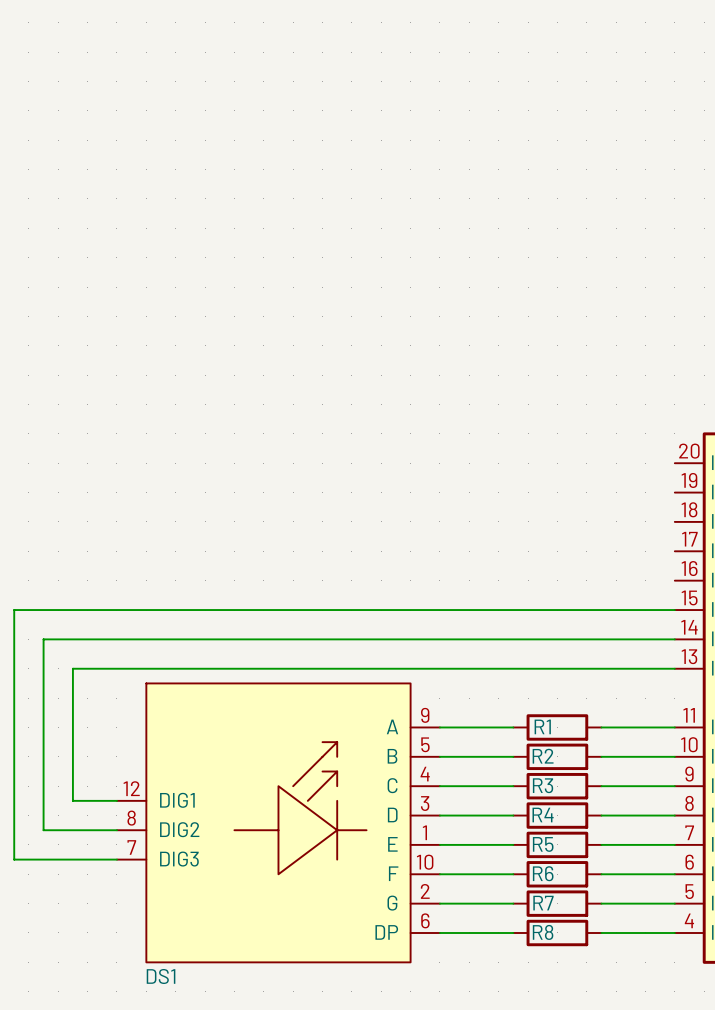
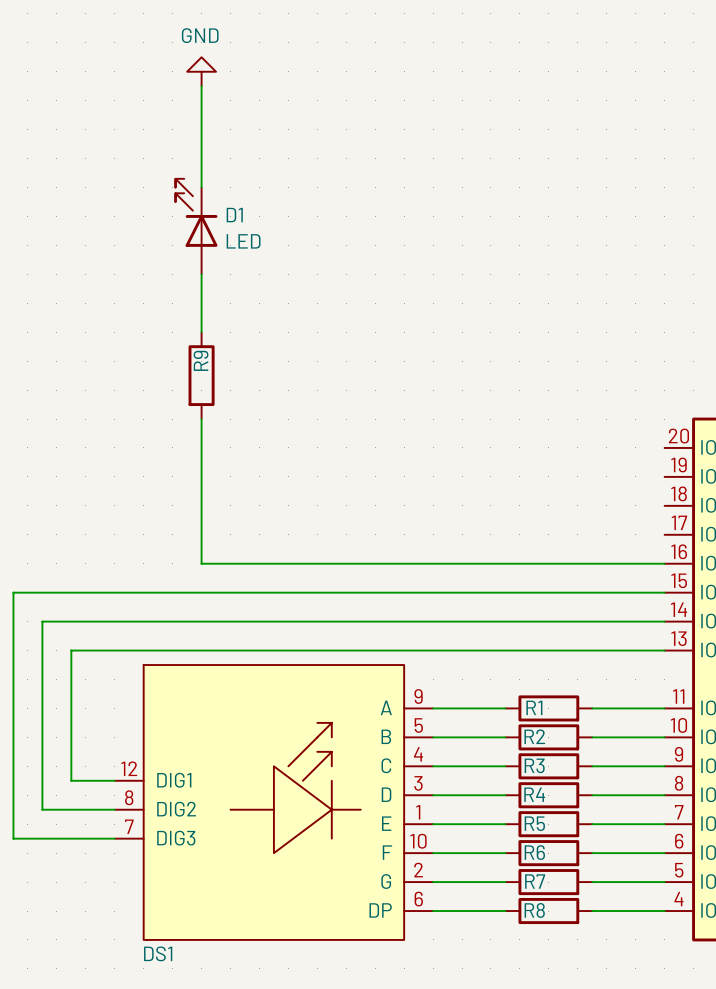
power symbol: none -> GND (201, 71)
wire: none -> (201, 86) (201, 187)
D1: none -> LED (196, 226)
wire: none -> (201, 274) (201, 332)
R9: none -> (201, 375)
wire: none -> (201, 419) (201, 563) (664, 563)

